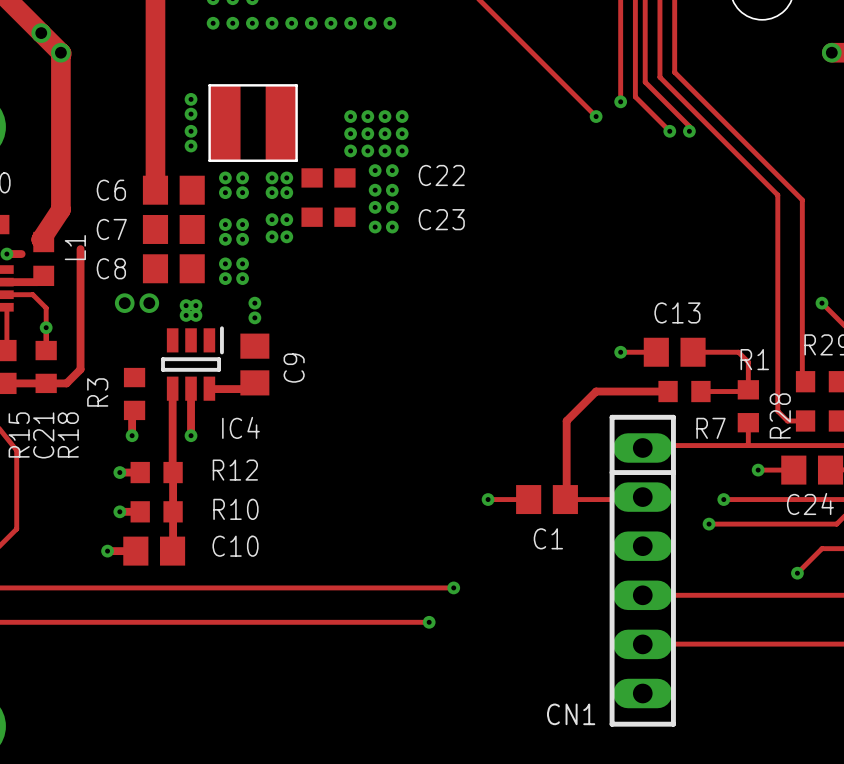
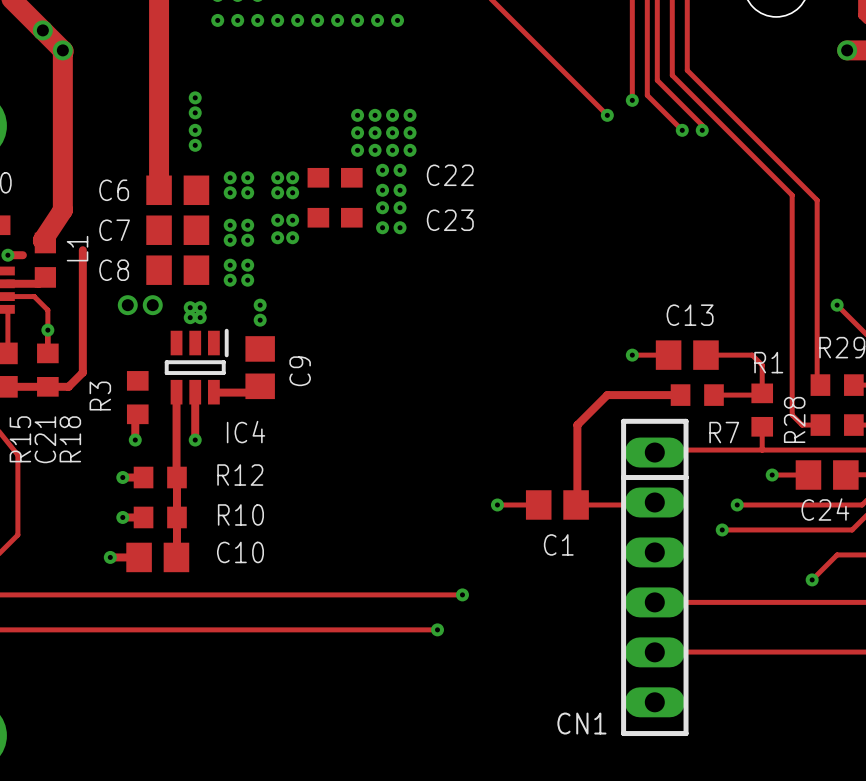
part: (253, 123) -> none

